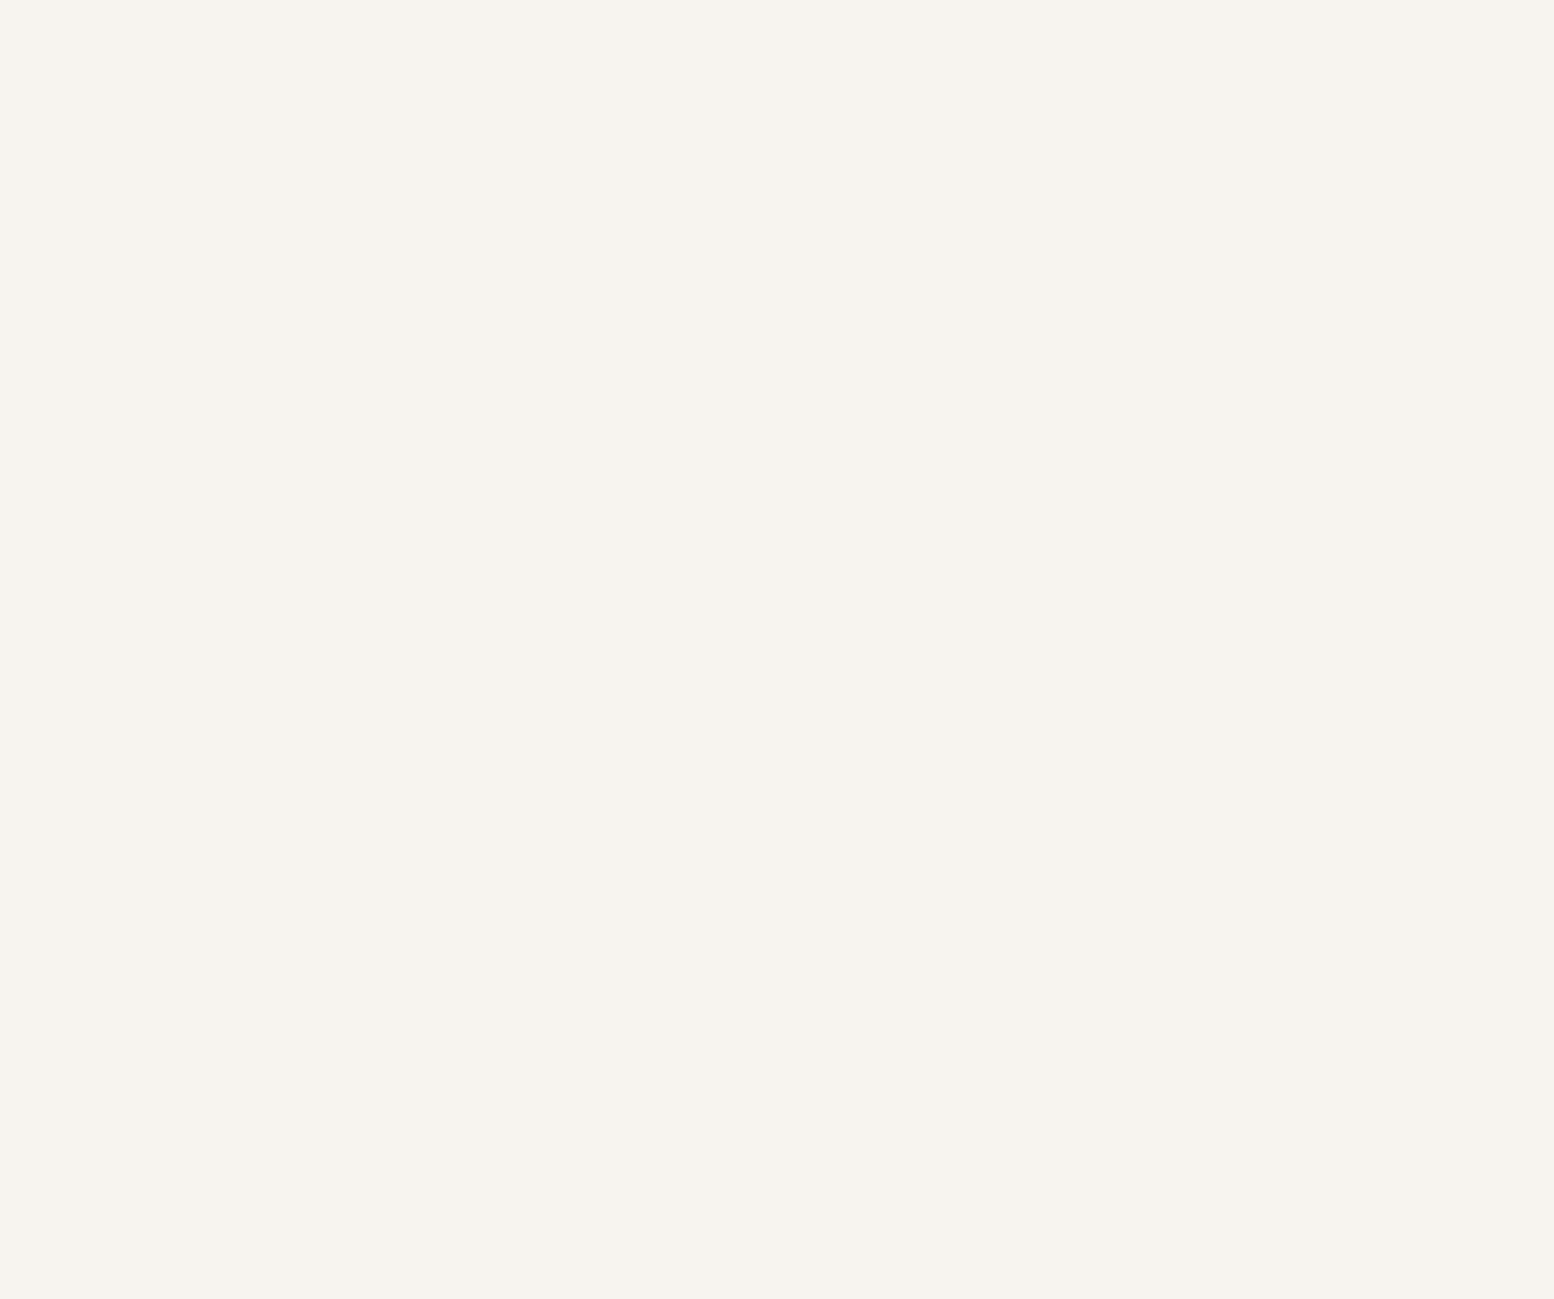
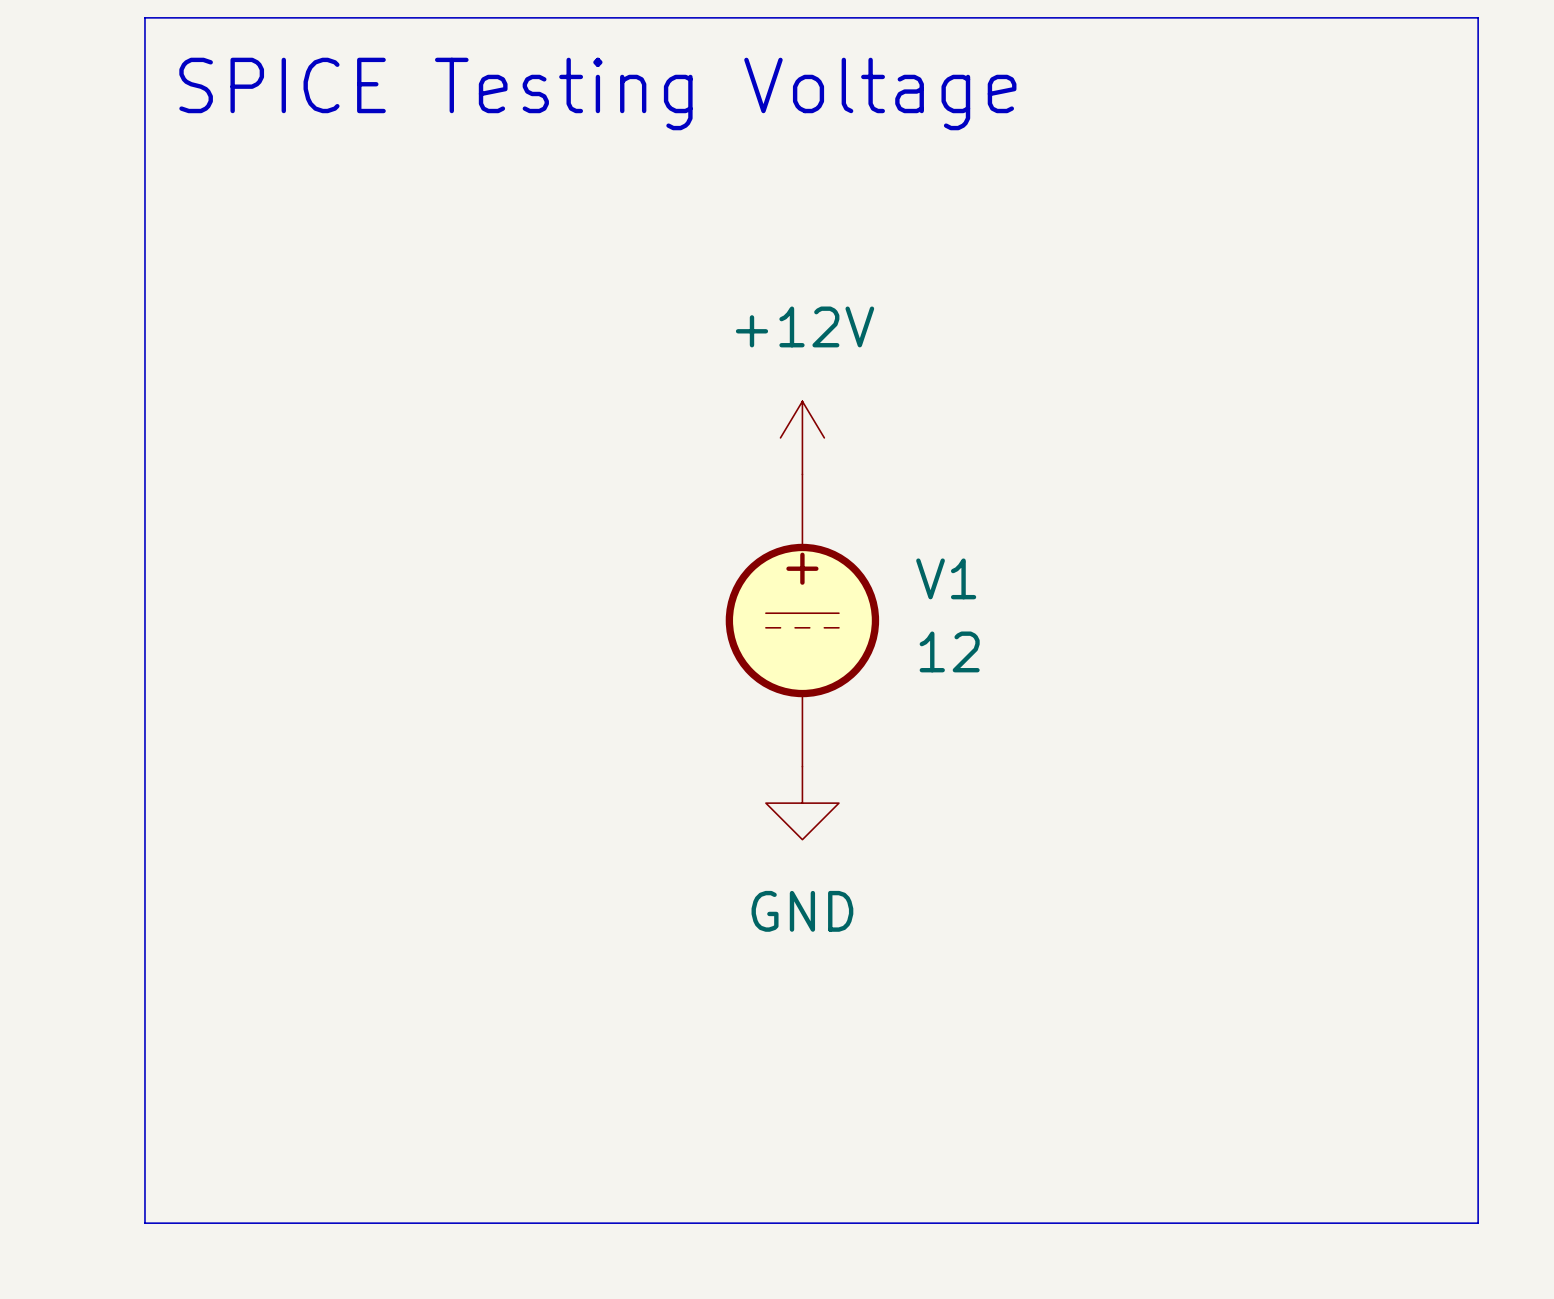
line: none -> (144, 17) (1478, 17) (1478, 1223) (144, 1223) (144, 17)
text: none -> SPICE Testing Voltage (597, 93)
power symbol: none -> +12V (802, 437)
V1: none -> 12 (802, 620)
power symbol: none -> GND (802, 803)

